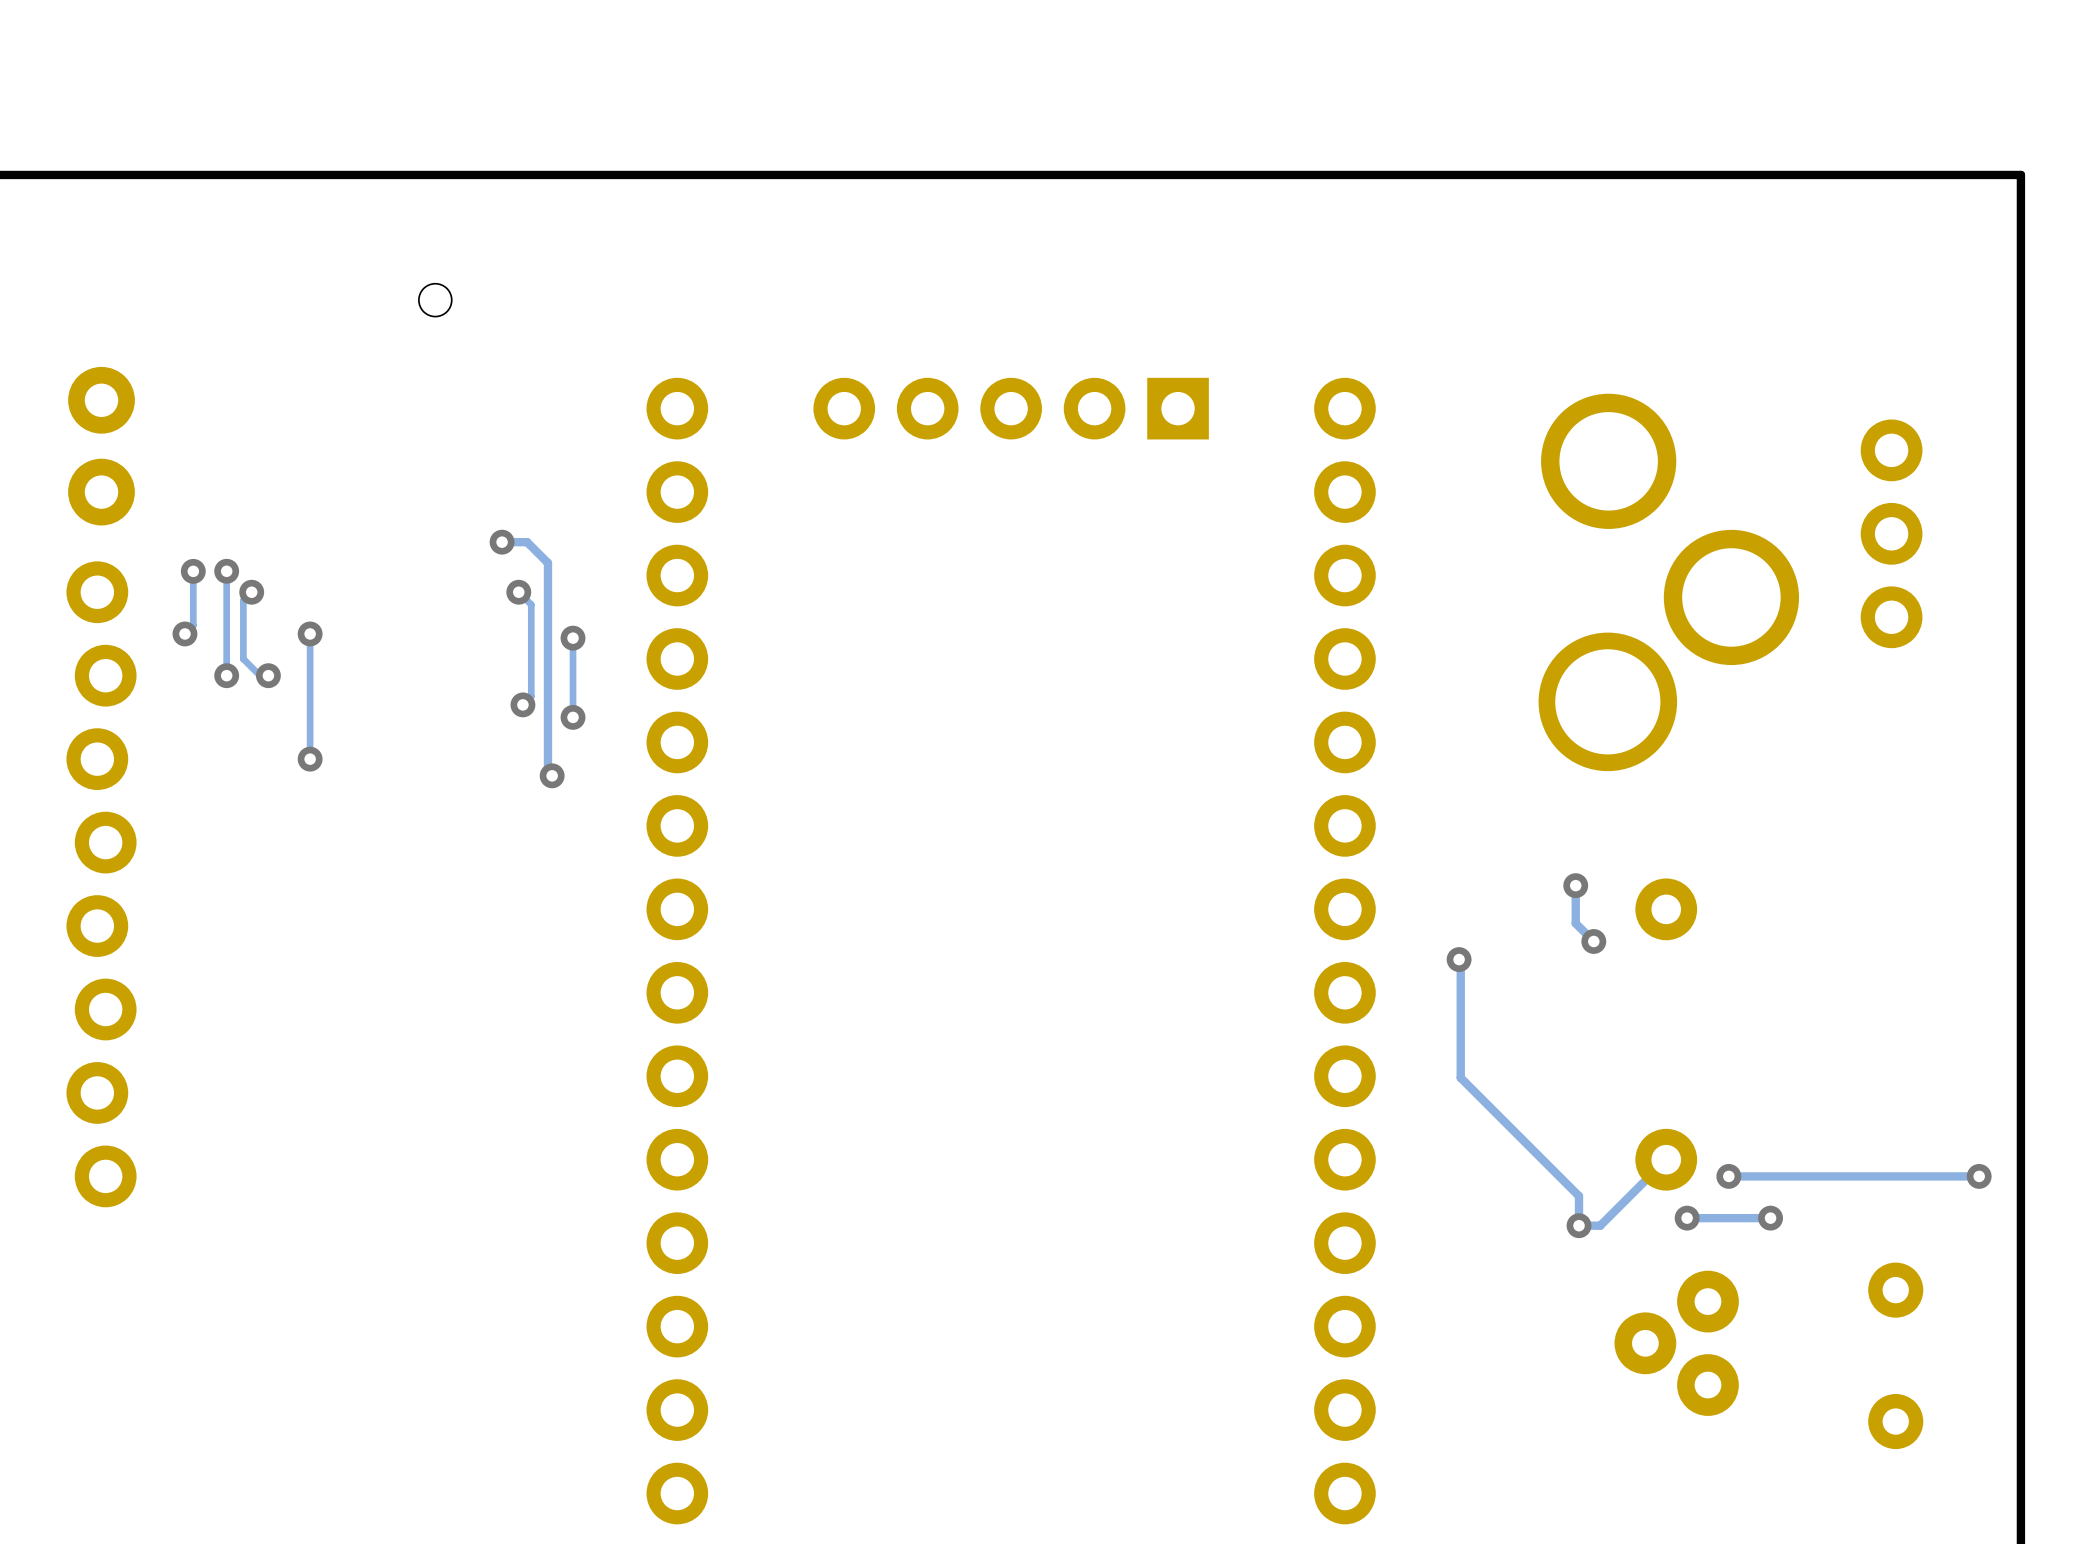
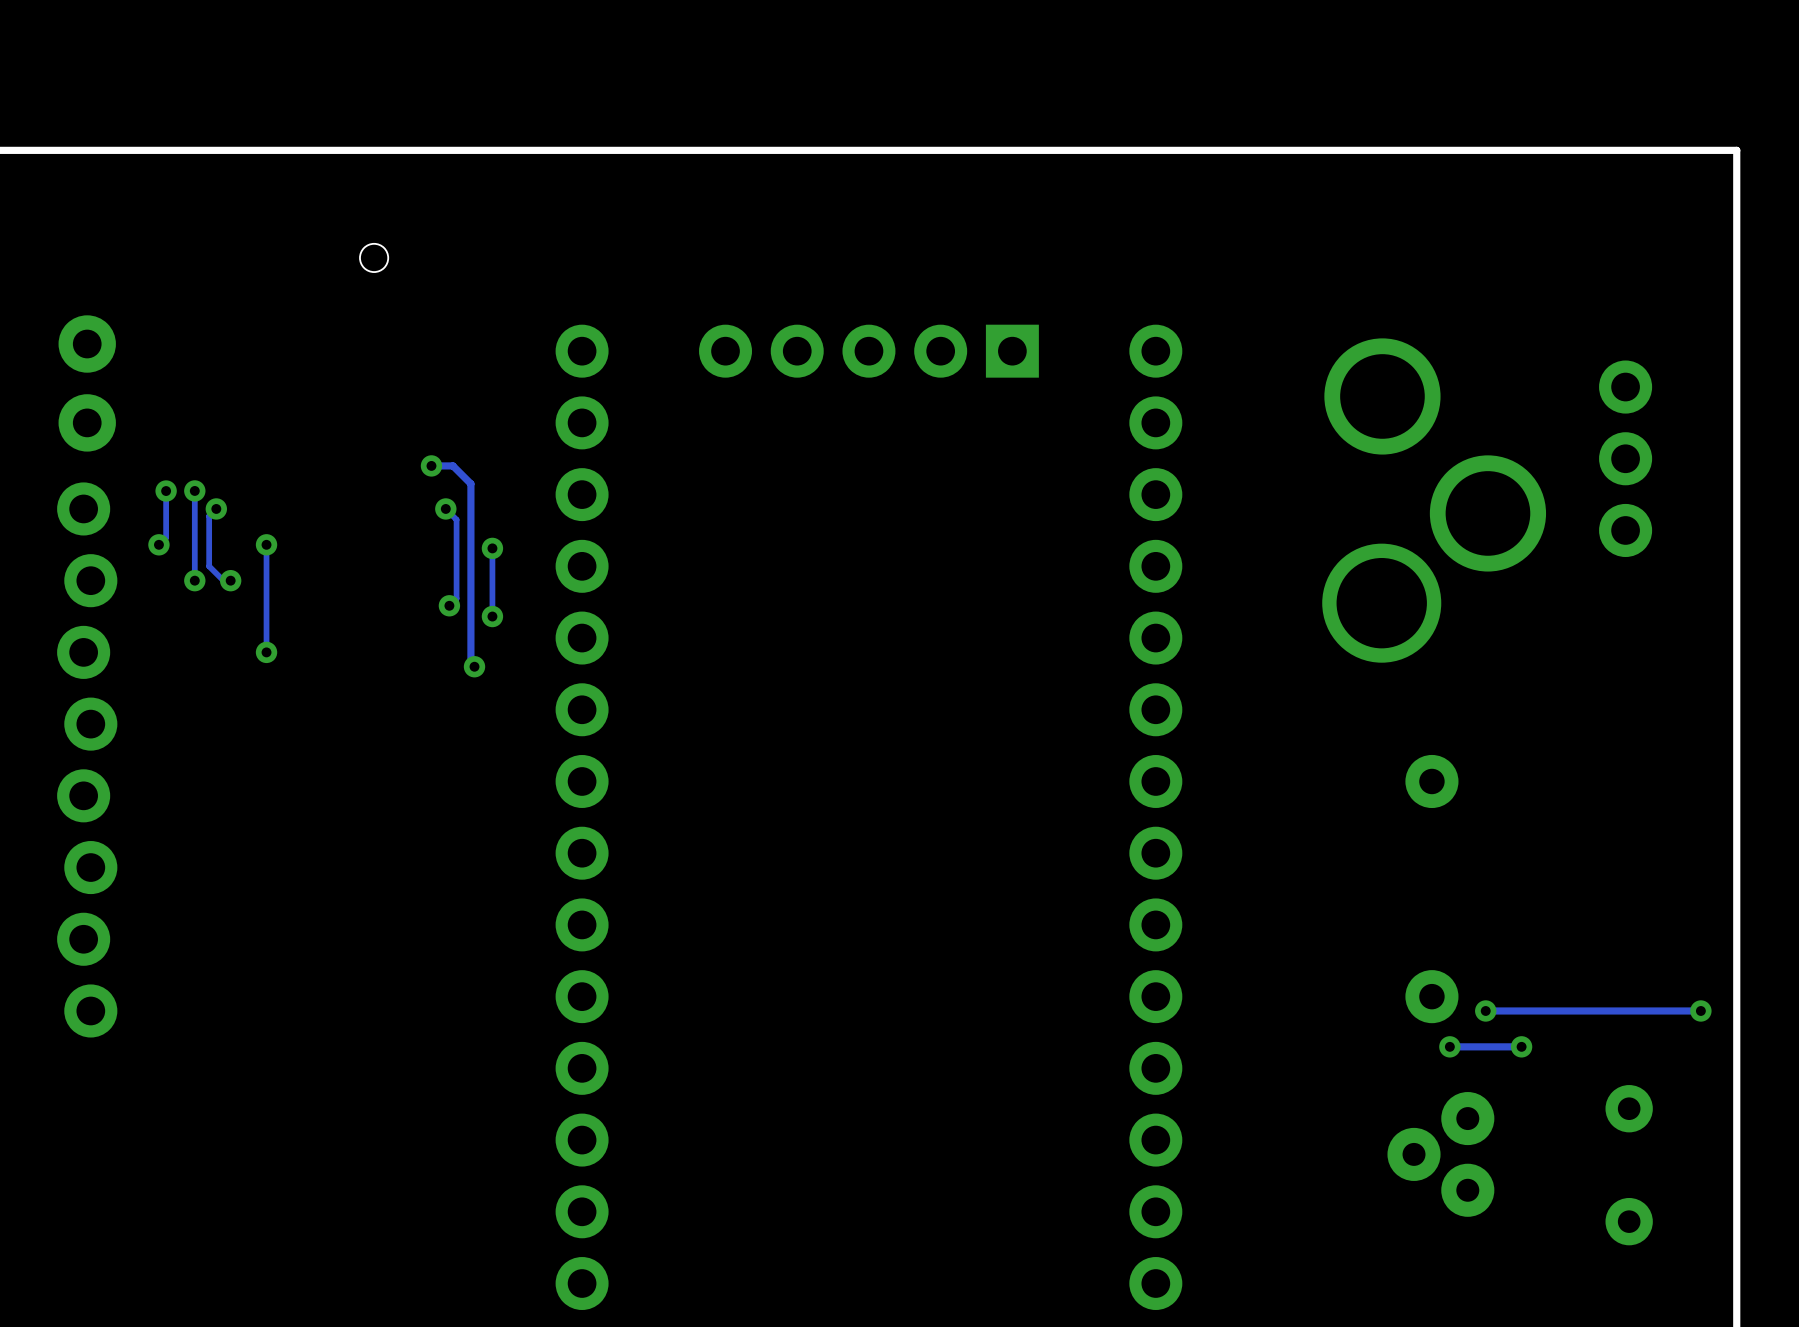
track: (1575, 885) (1575, 923) (1593, 941) -> none
via: (1575, 885) -> none
via: (1593, 941) -> none
track: (1459, 959) (1460, 959) (1460, 1077) (1579, 1196) (1579, 1225) (1600, 1225) (1666, 1159) -> none
via: (1459, 959) -> none
via: (1579, 1225) -> none

